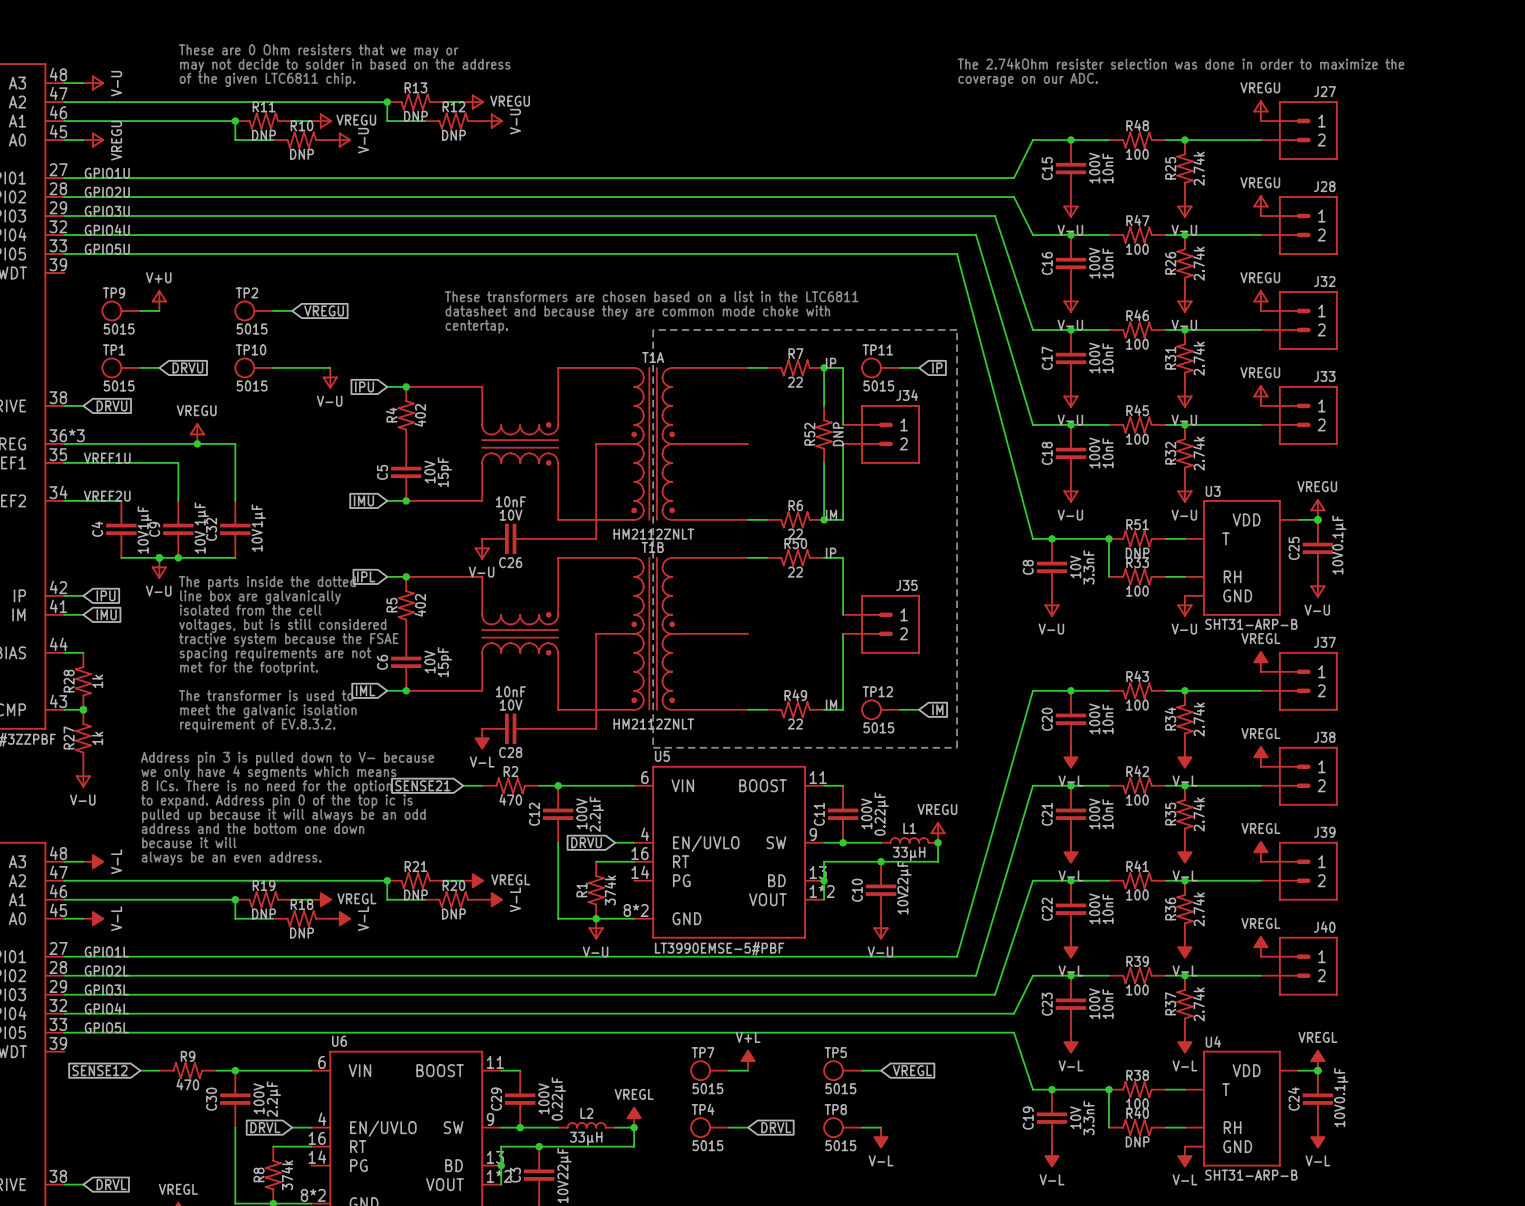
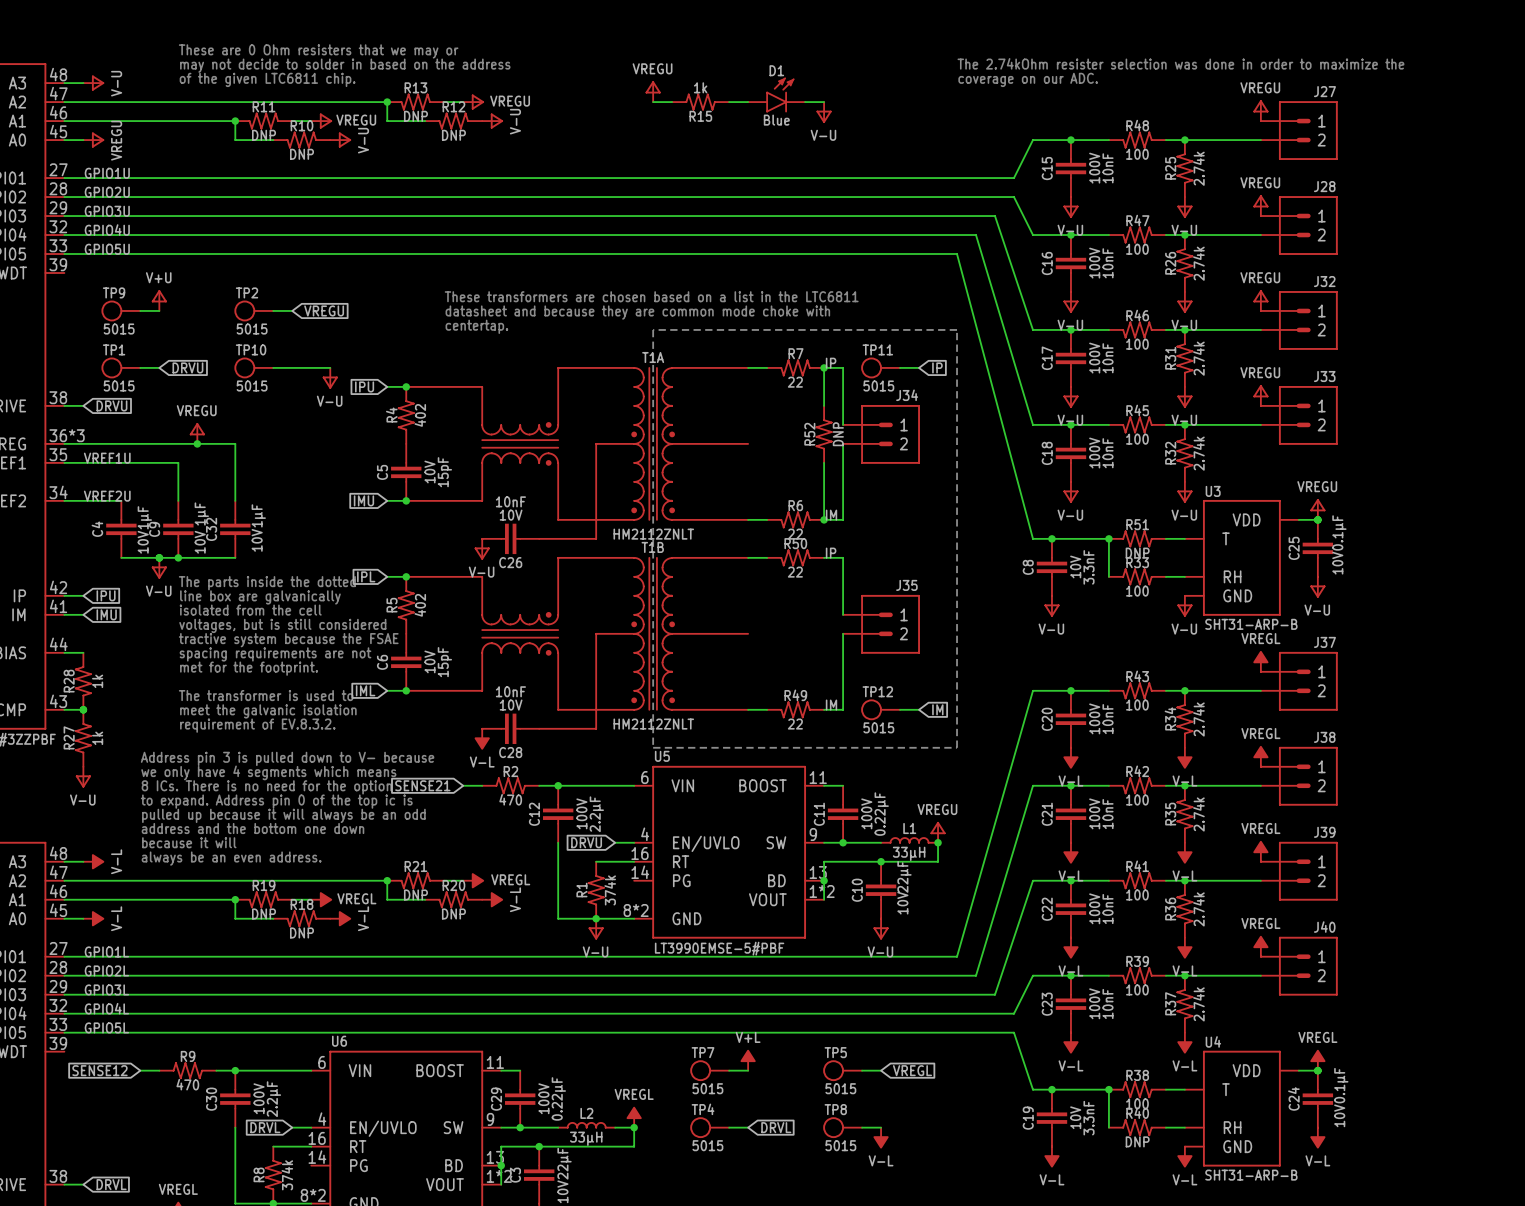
power symbol: none -> VREGU (653, 91)
D1: none -> (776, 94)
wire: none -> (653, 102) (672, 102)
R15: none -> (700, 102)
wire: none -> (729, 102) (748, 102)
wire: none -> (805, 102) (824, 102)
power symbol: none -> V-U (824, 112)

